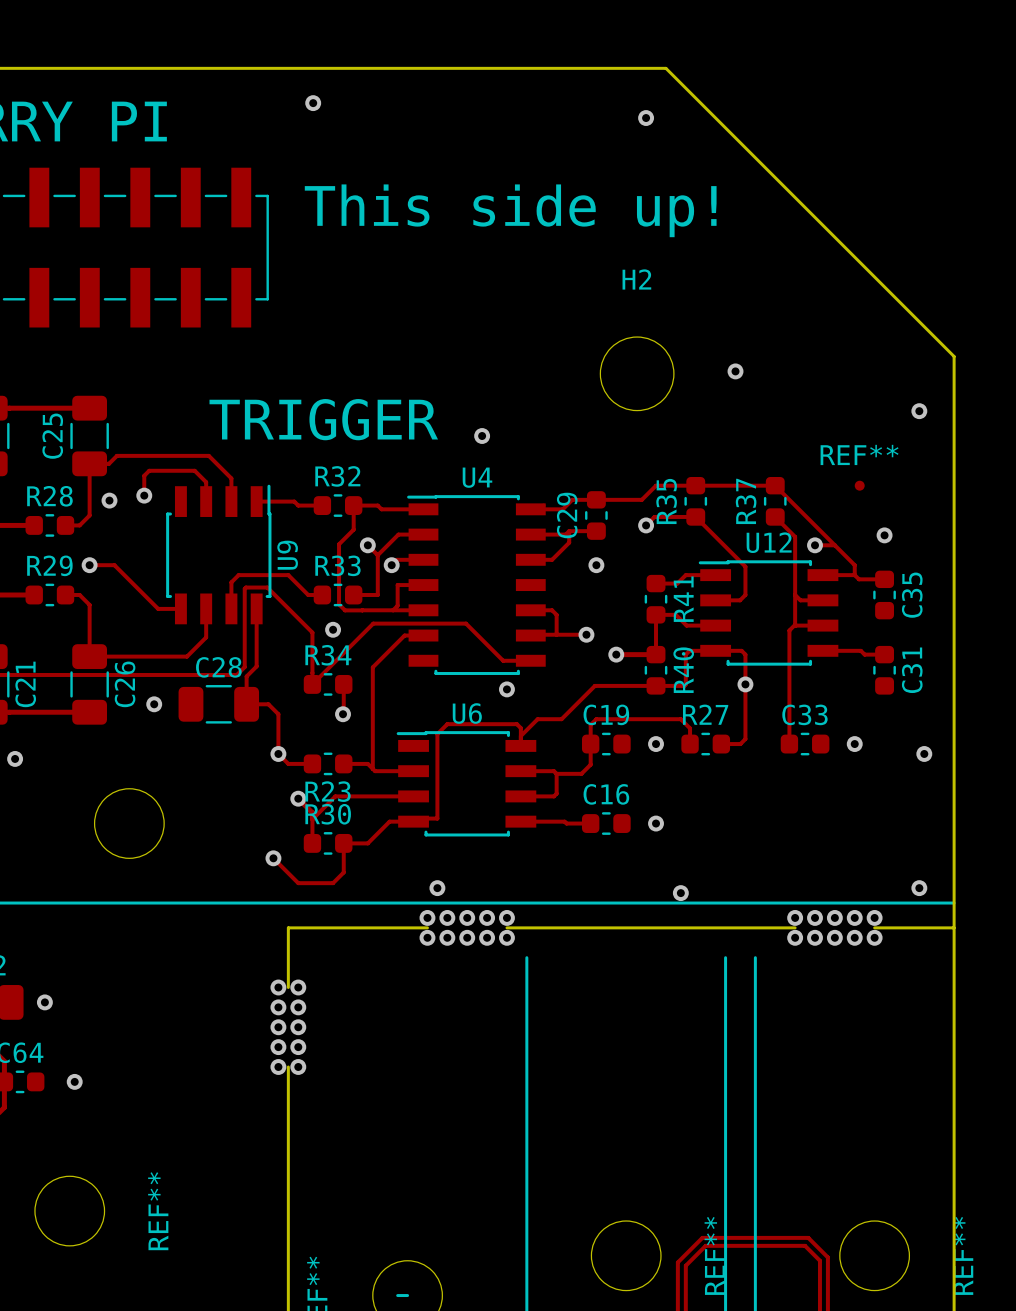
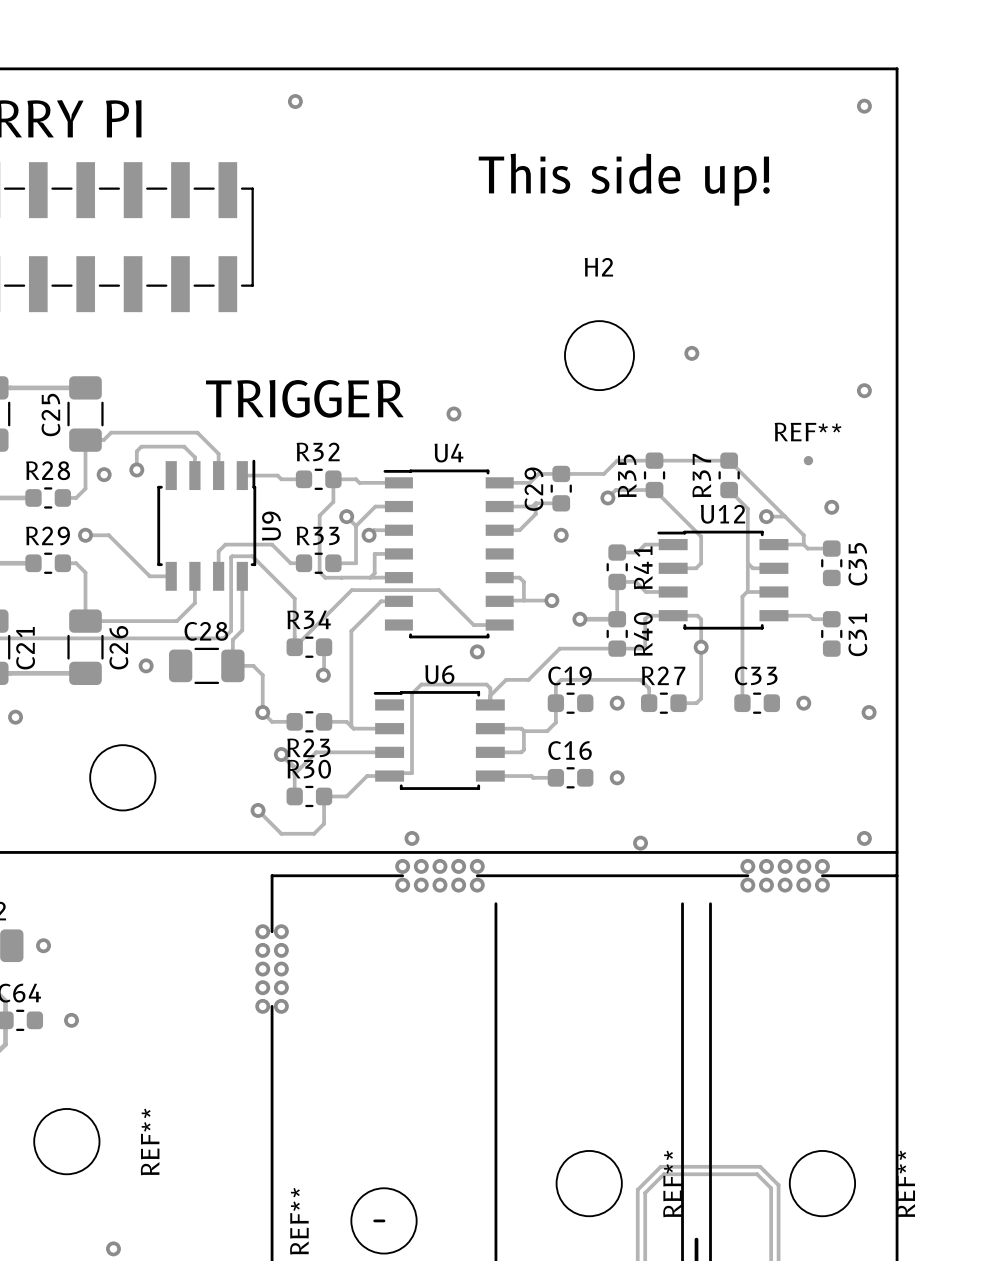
board edge: (665, 68) (954, 356) -> (626, 68) (897, 68) (897, 339)
via: none -> (864, 106)
via: (646, 118) -> none
text position: This side up! (510, 210) -> This side up! (624, 179)
via: (333, 629) -> none

